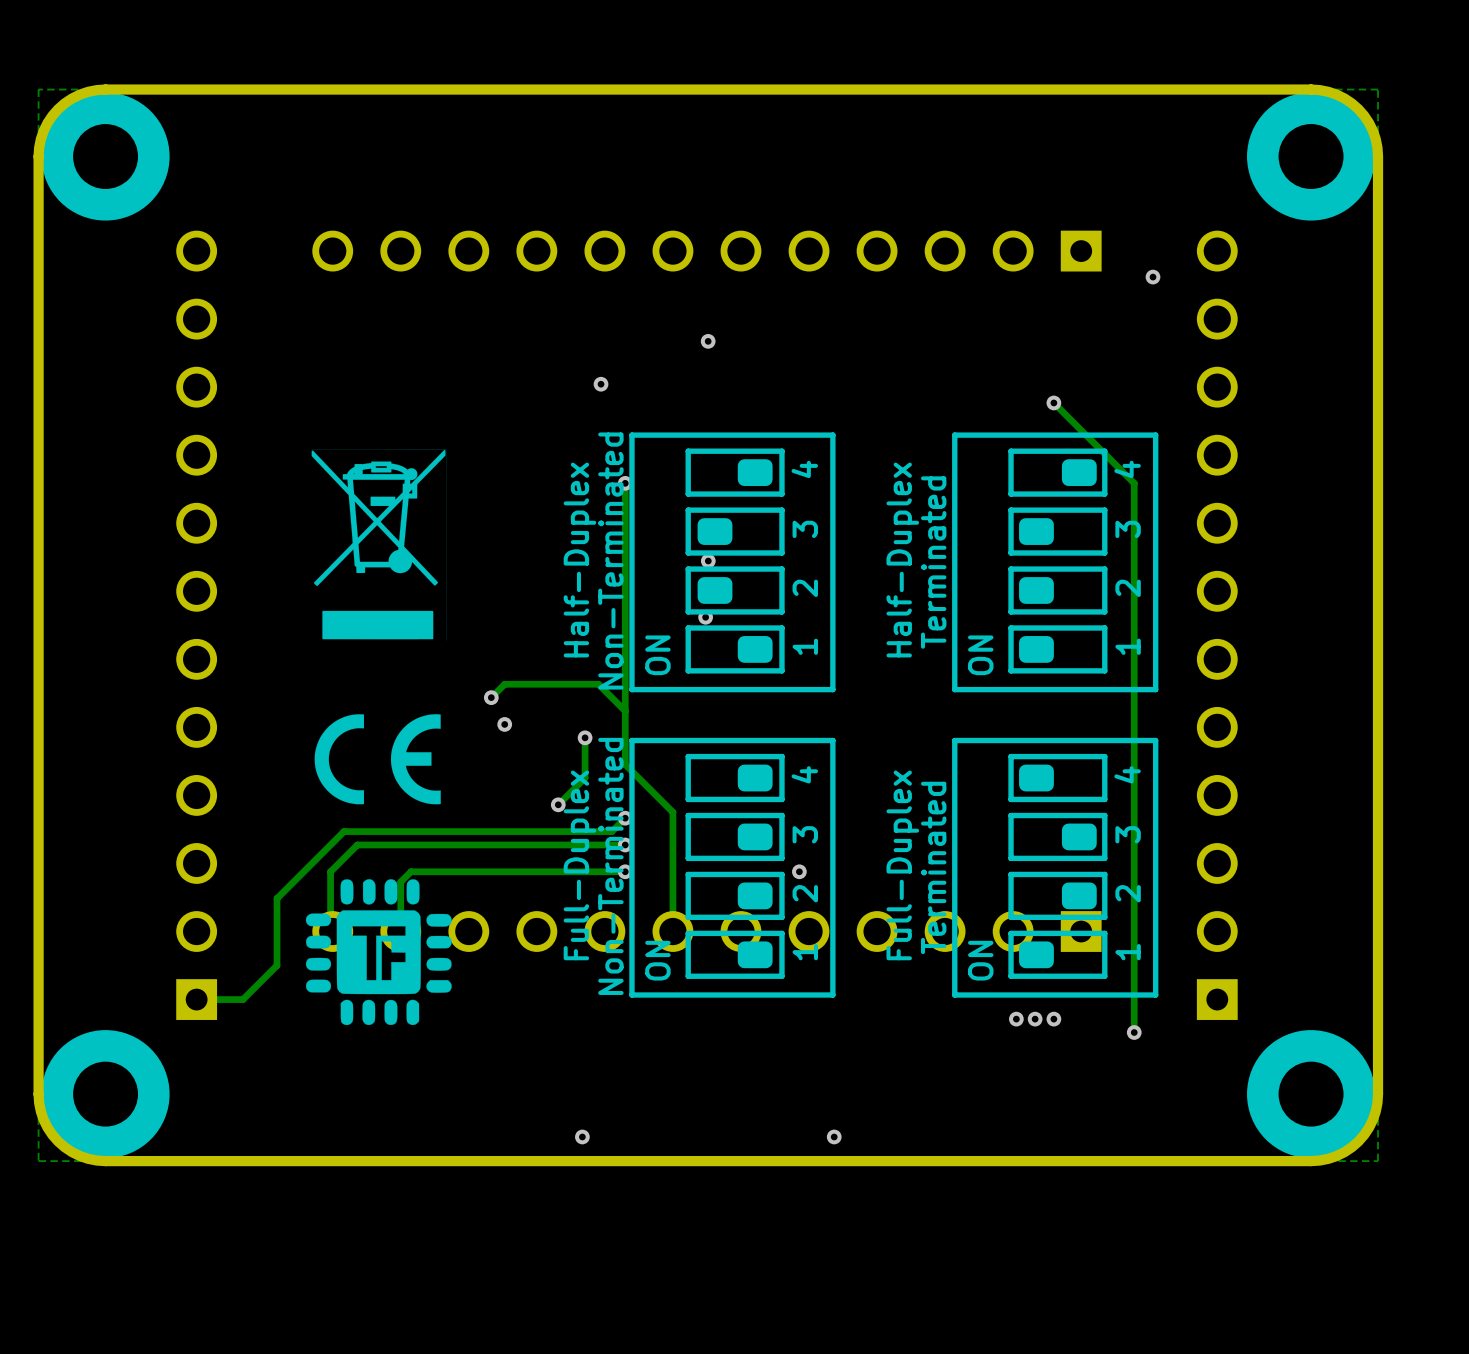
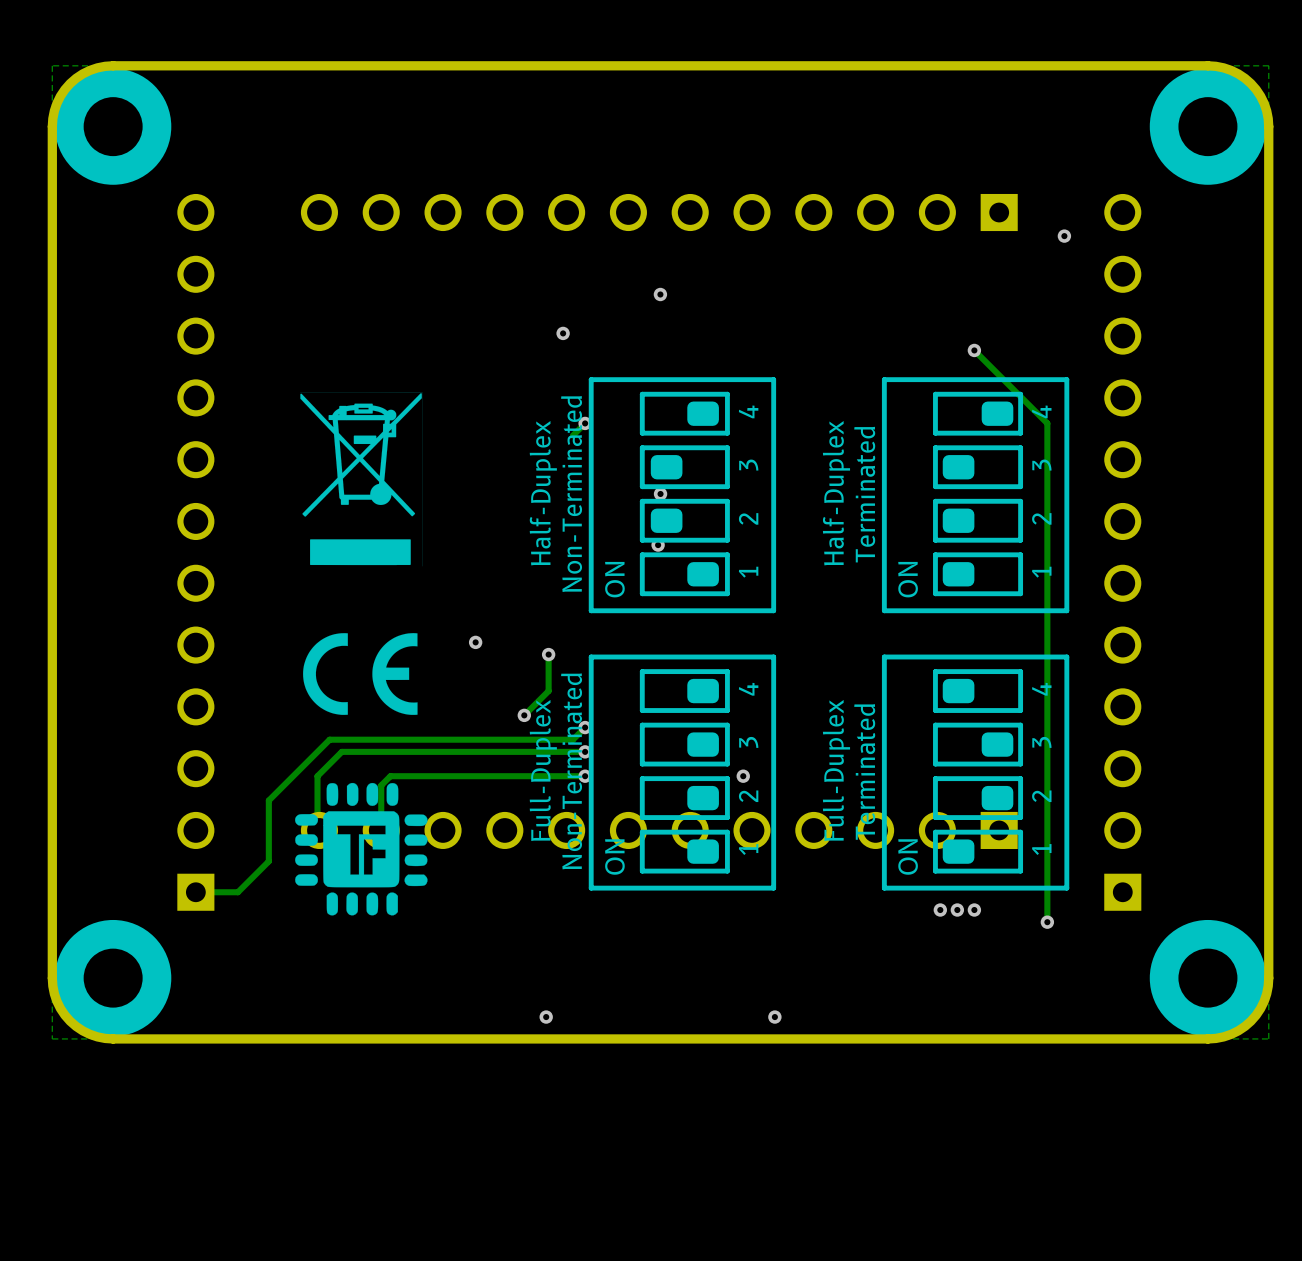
track: (625, 483) (625, 764) (672, 812) (672, 931) -> (585, 423) (572, 435)
track: (491, 697) (504, 684) (598, 684) (625, 711) -> none
via: (491, 697) -> none

